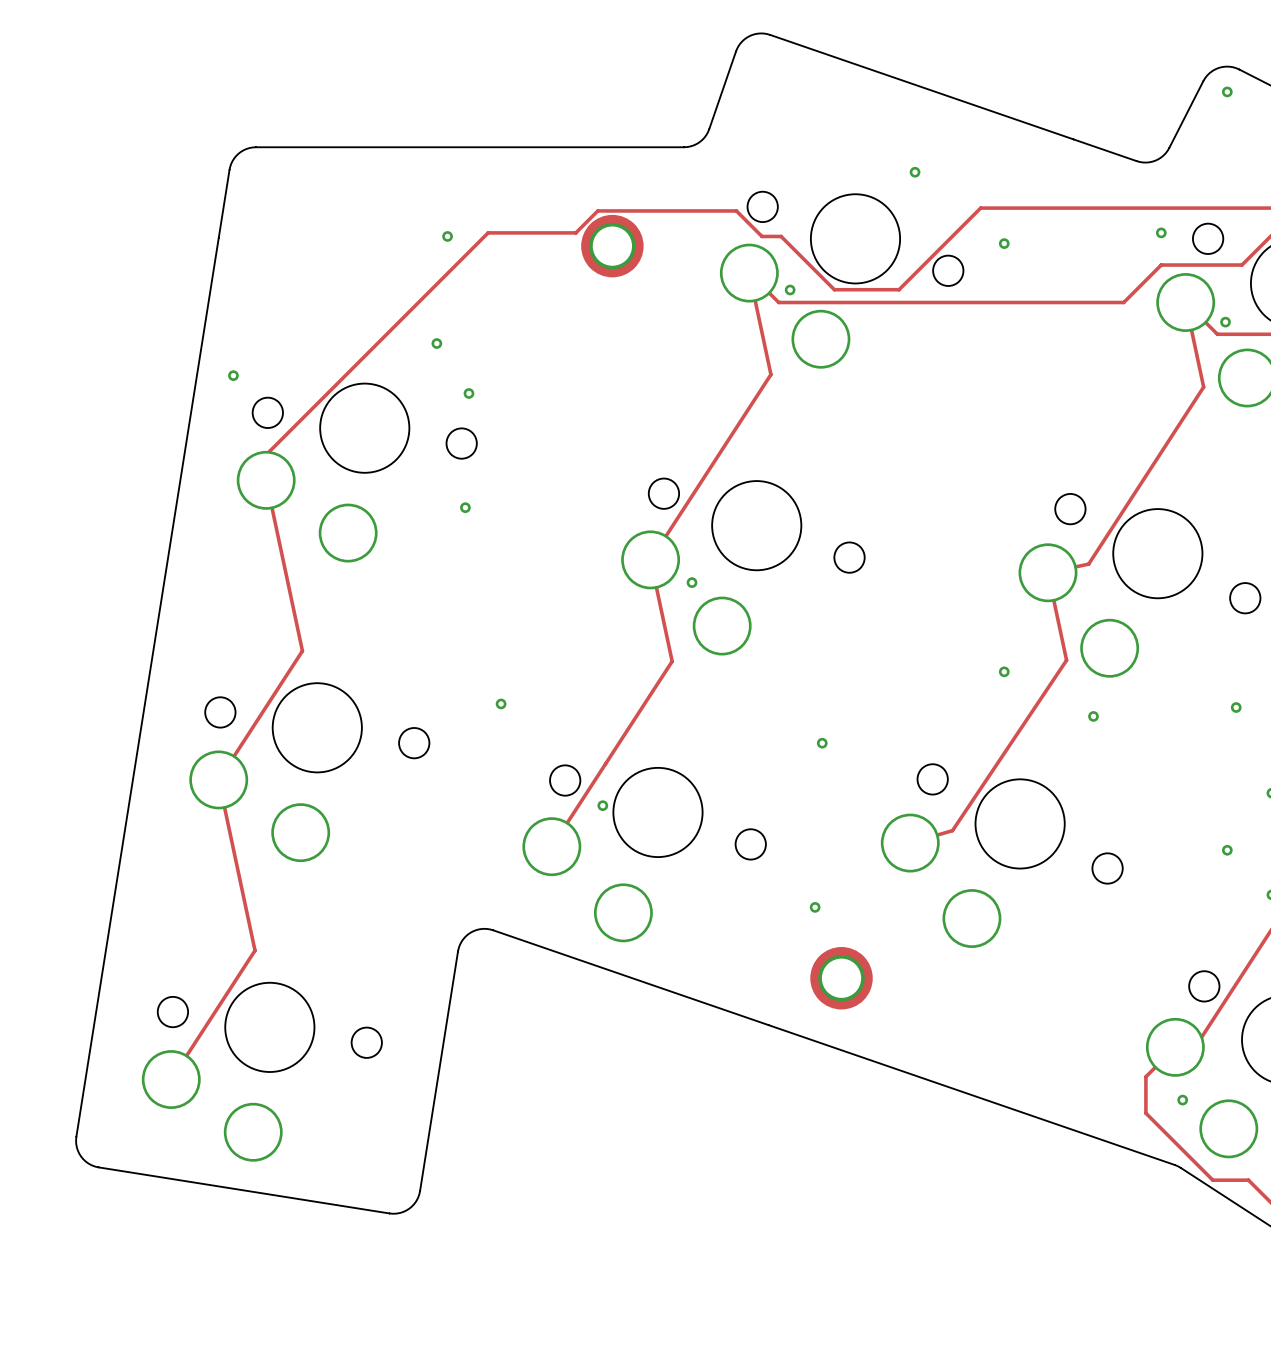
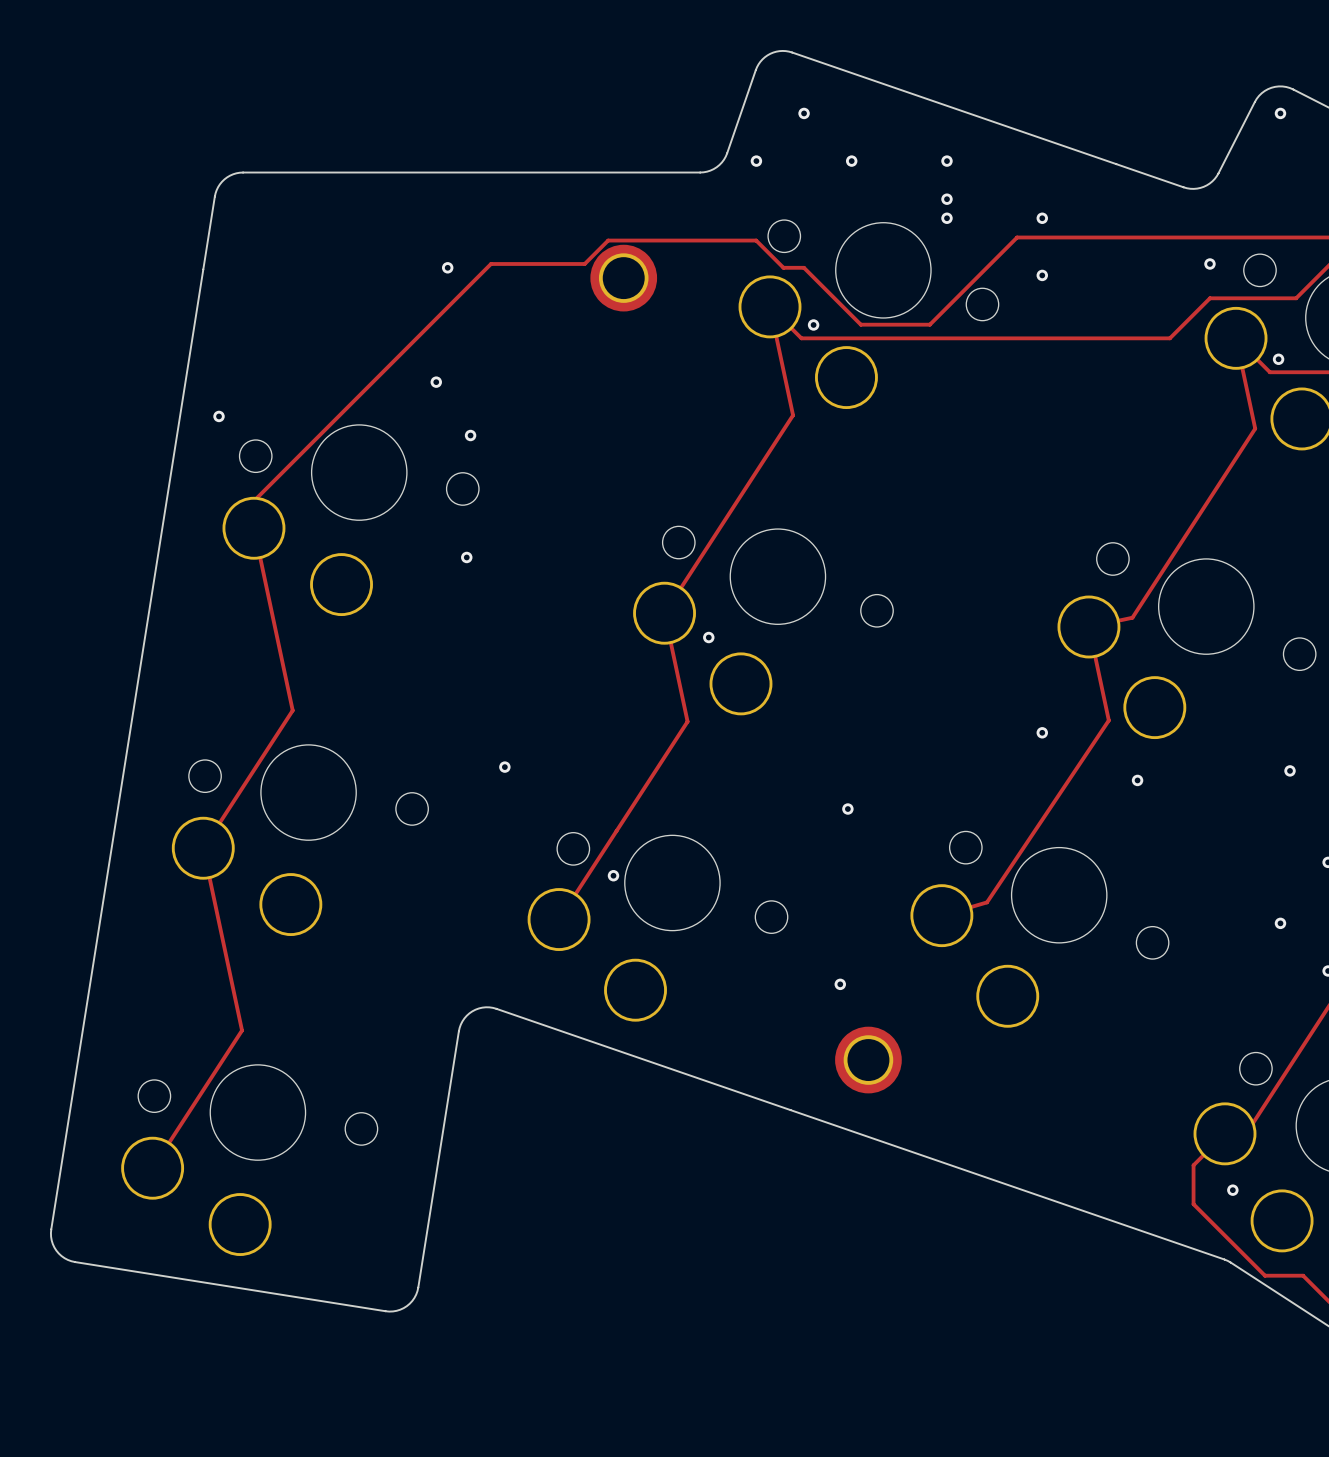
via: none -> (804, 113)
via: none -> (756, 161)
via: none -> (851, 161)
via: none -> (946, 161)
via: none -> (946, 218)
via: none -> (1042, 218)

